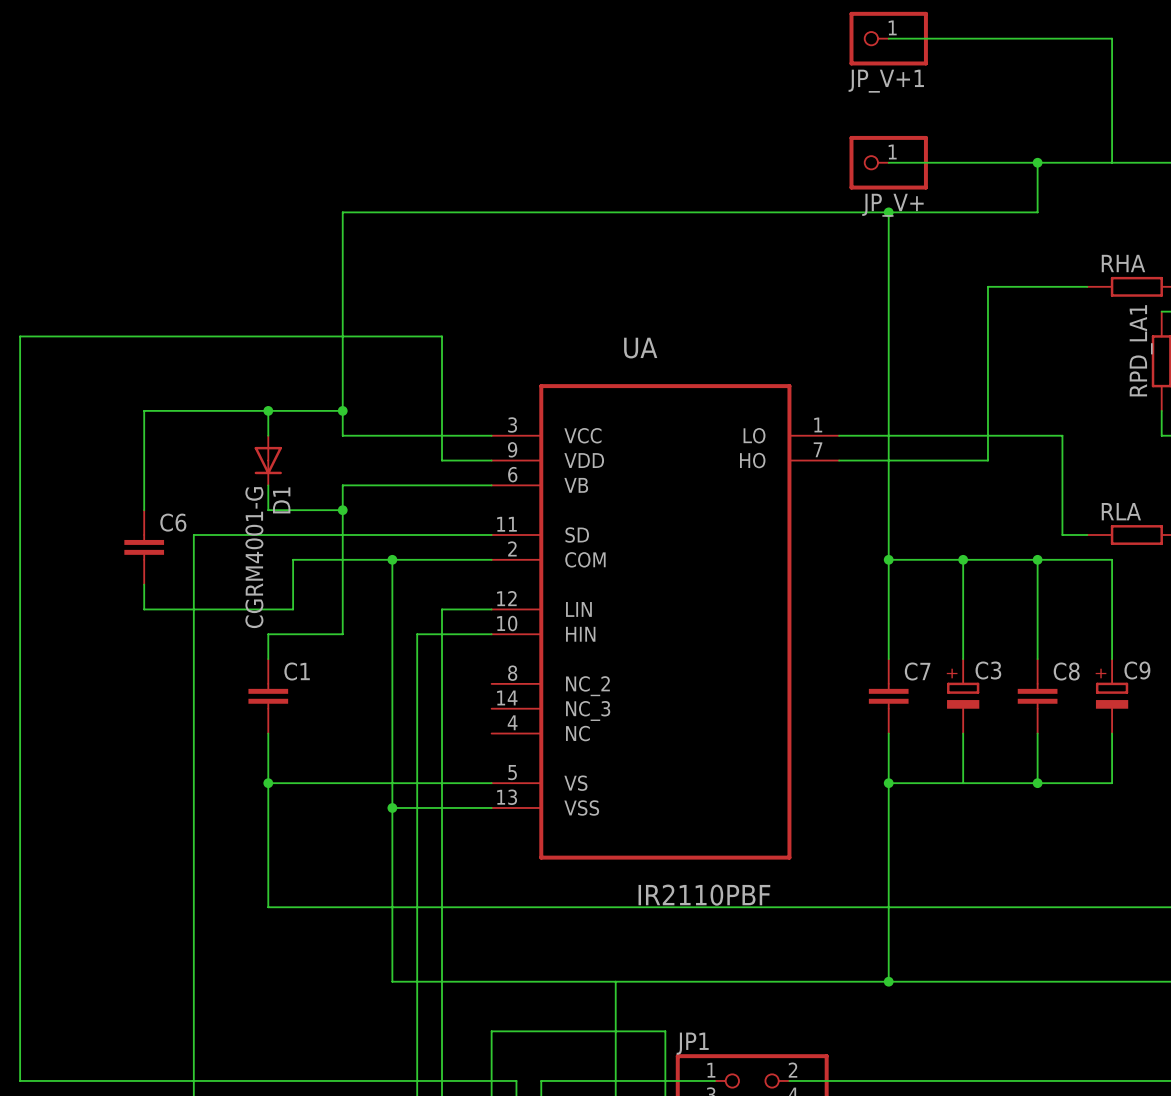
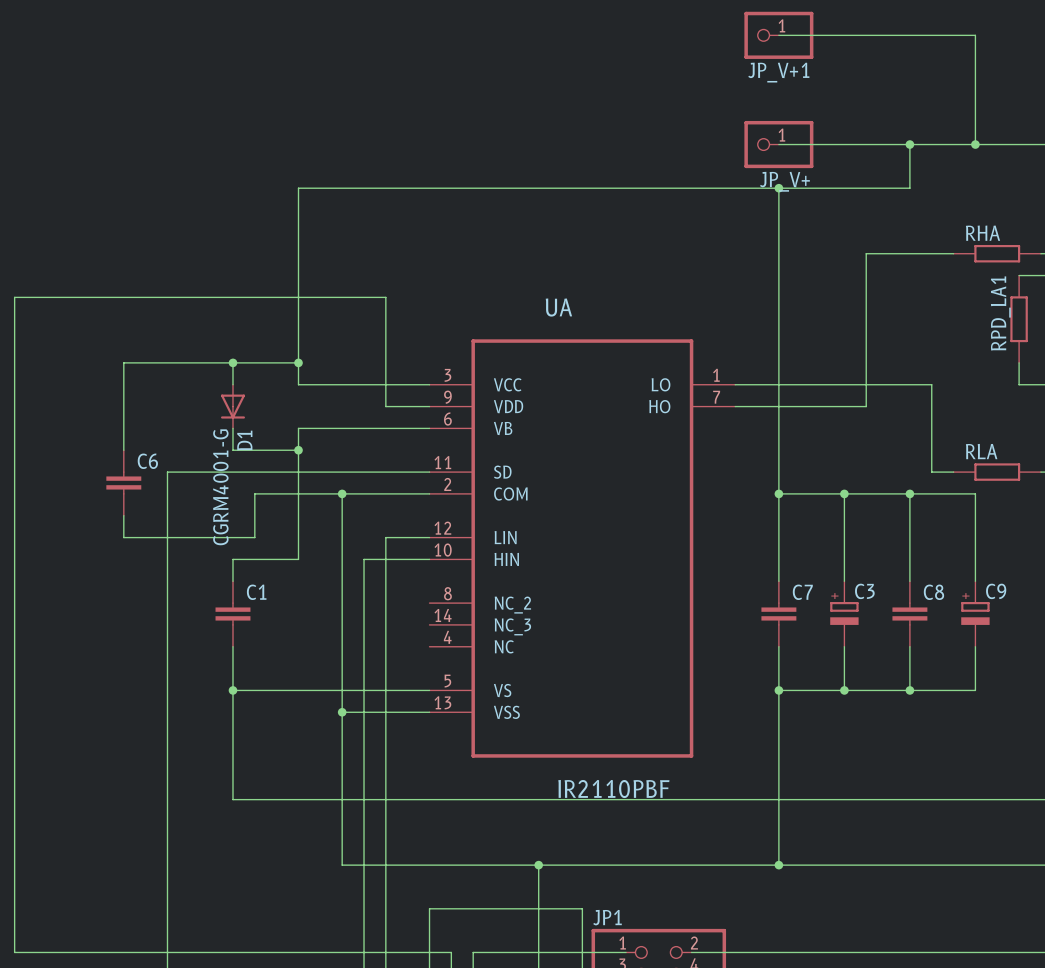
junction: none -> (975, 144)
junction: none -> (844, 690)
junction: none -> (538, 865)

